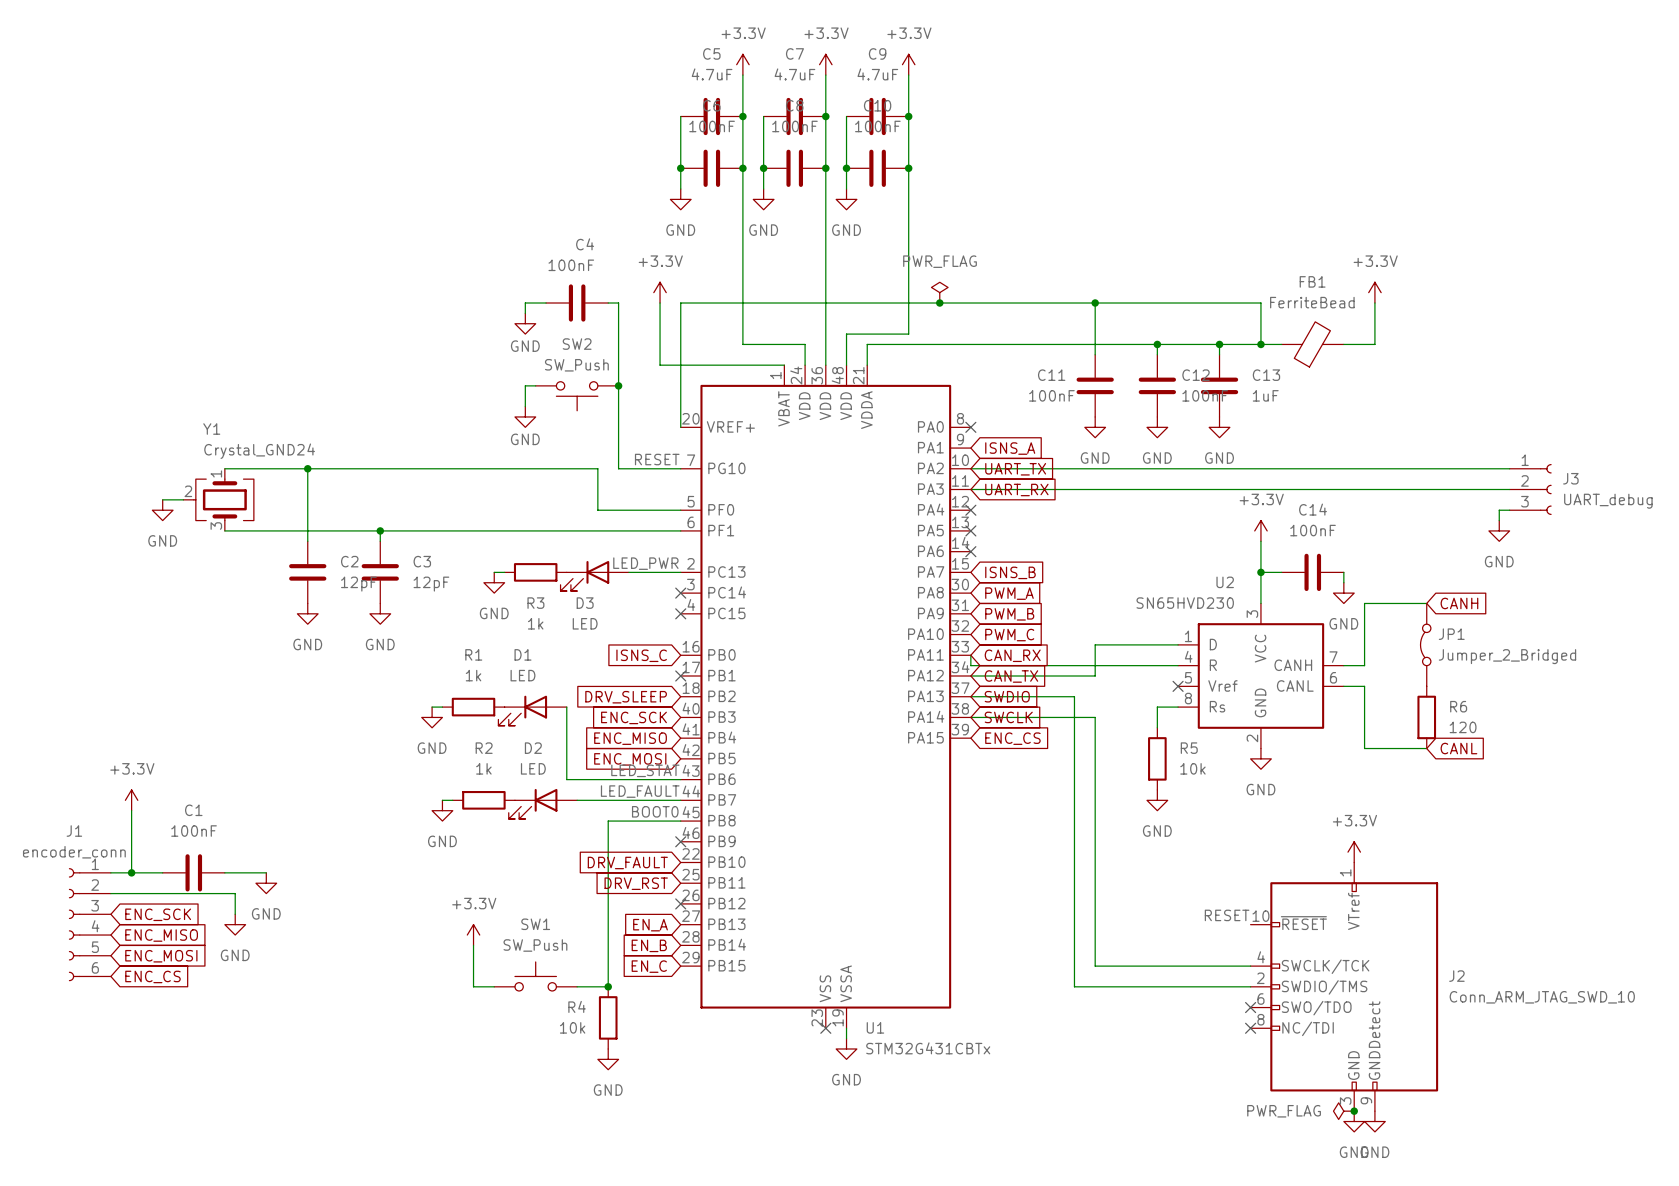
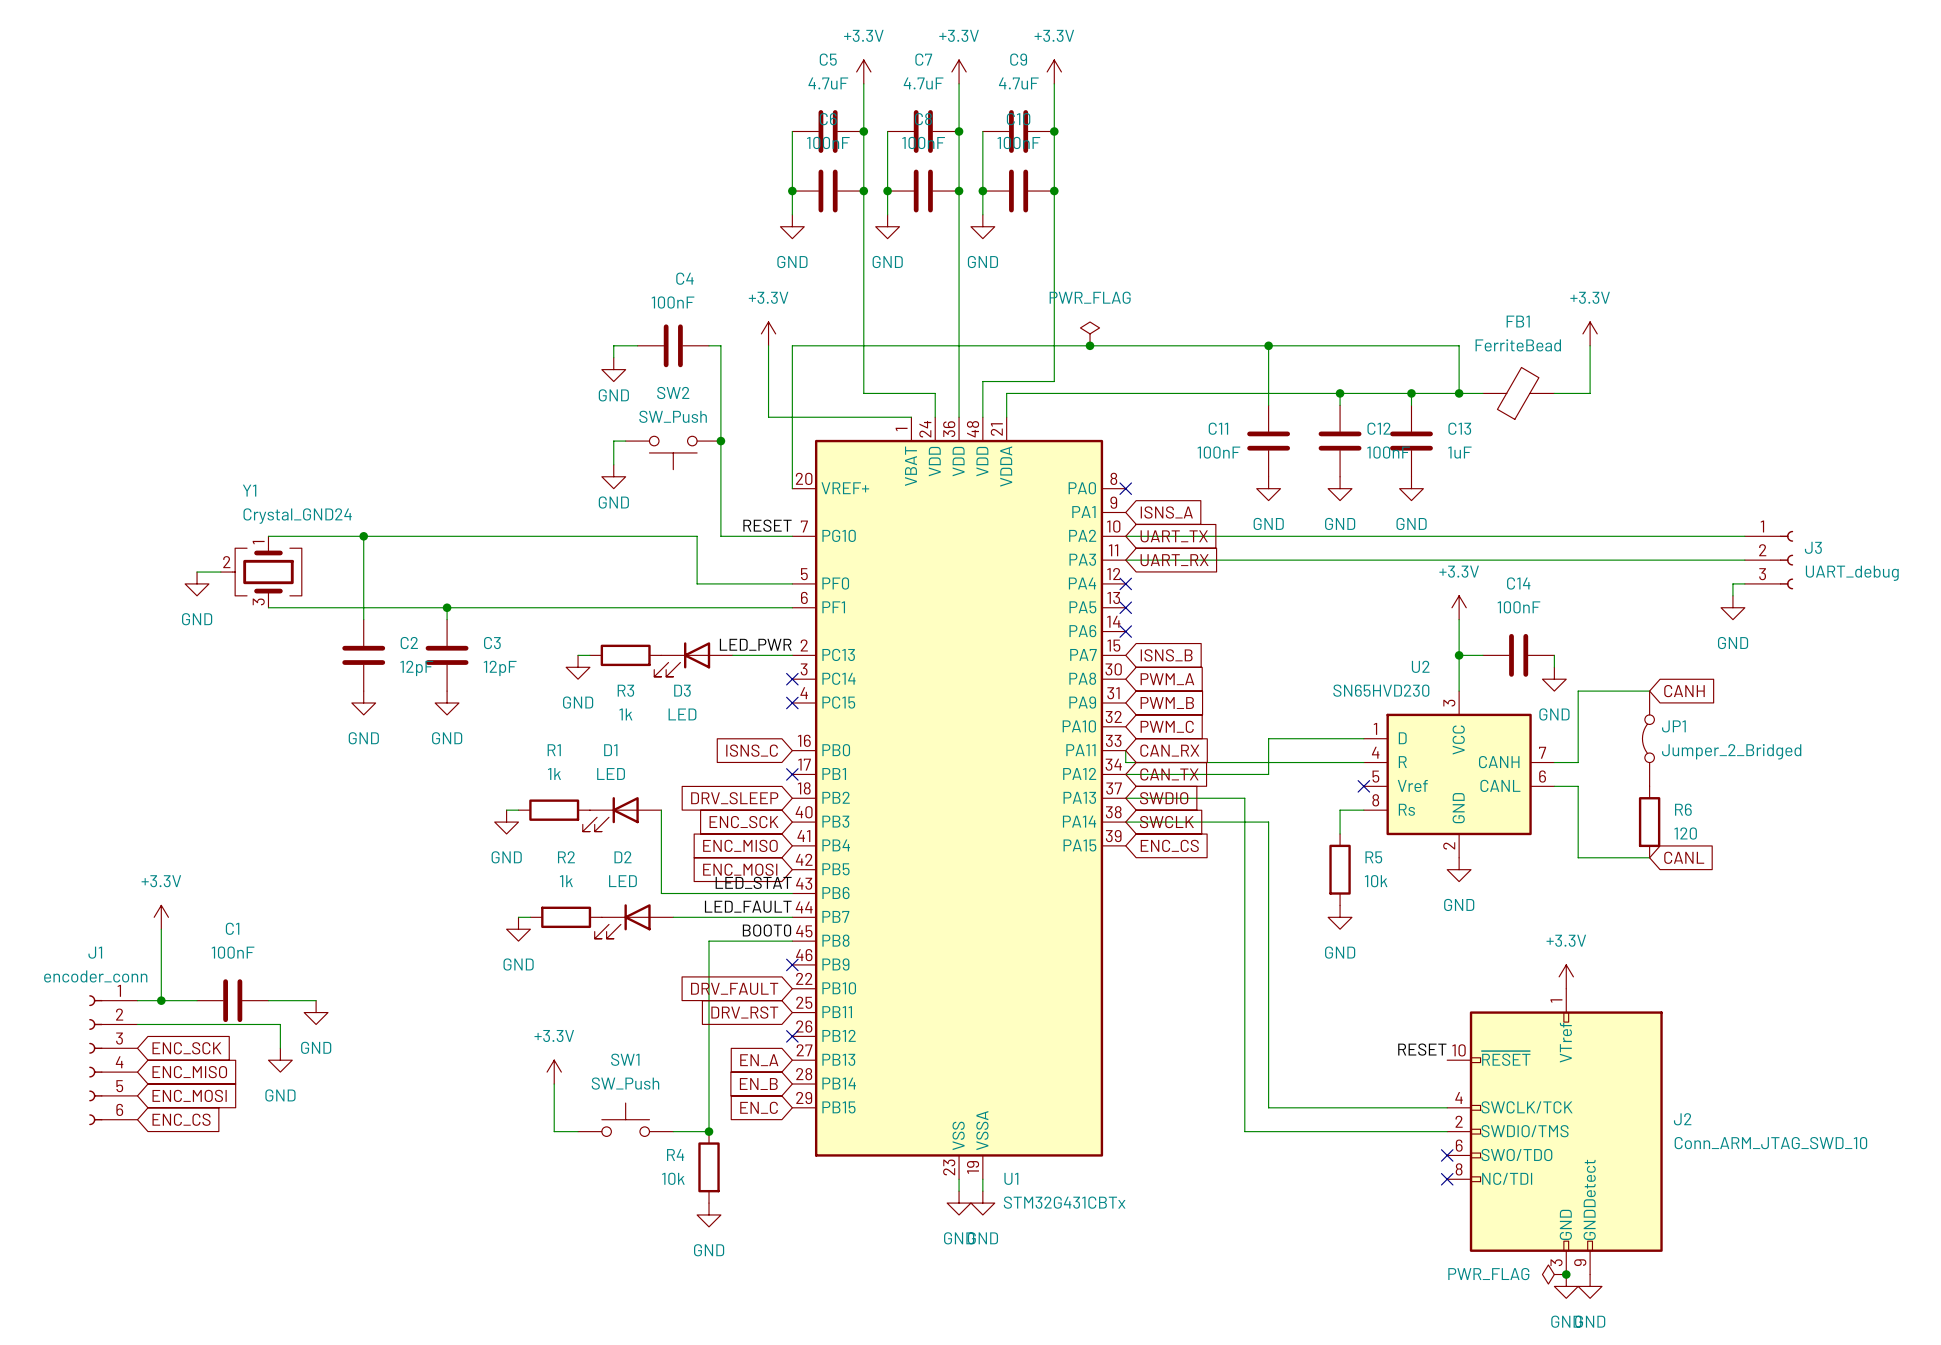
wire: none -> (959, 1179) (959, 1191)
no-connect mark: (825, 1028) -> none
power symbol: none -> GND (959, 1203)

